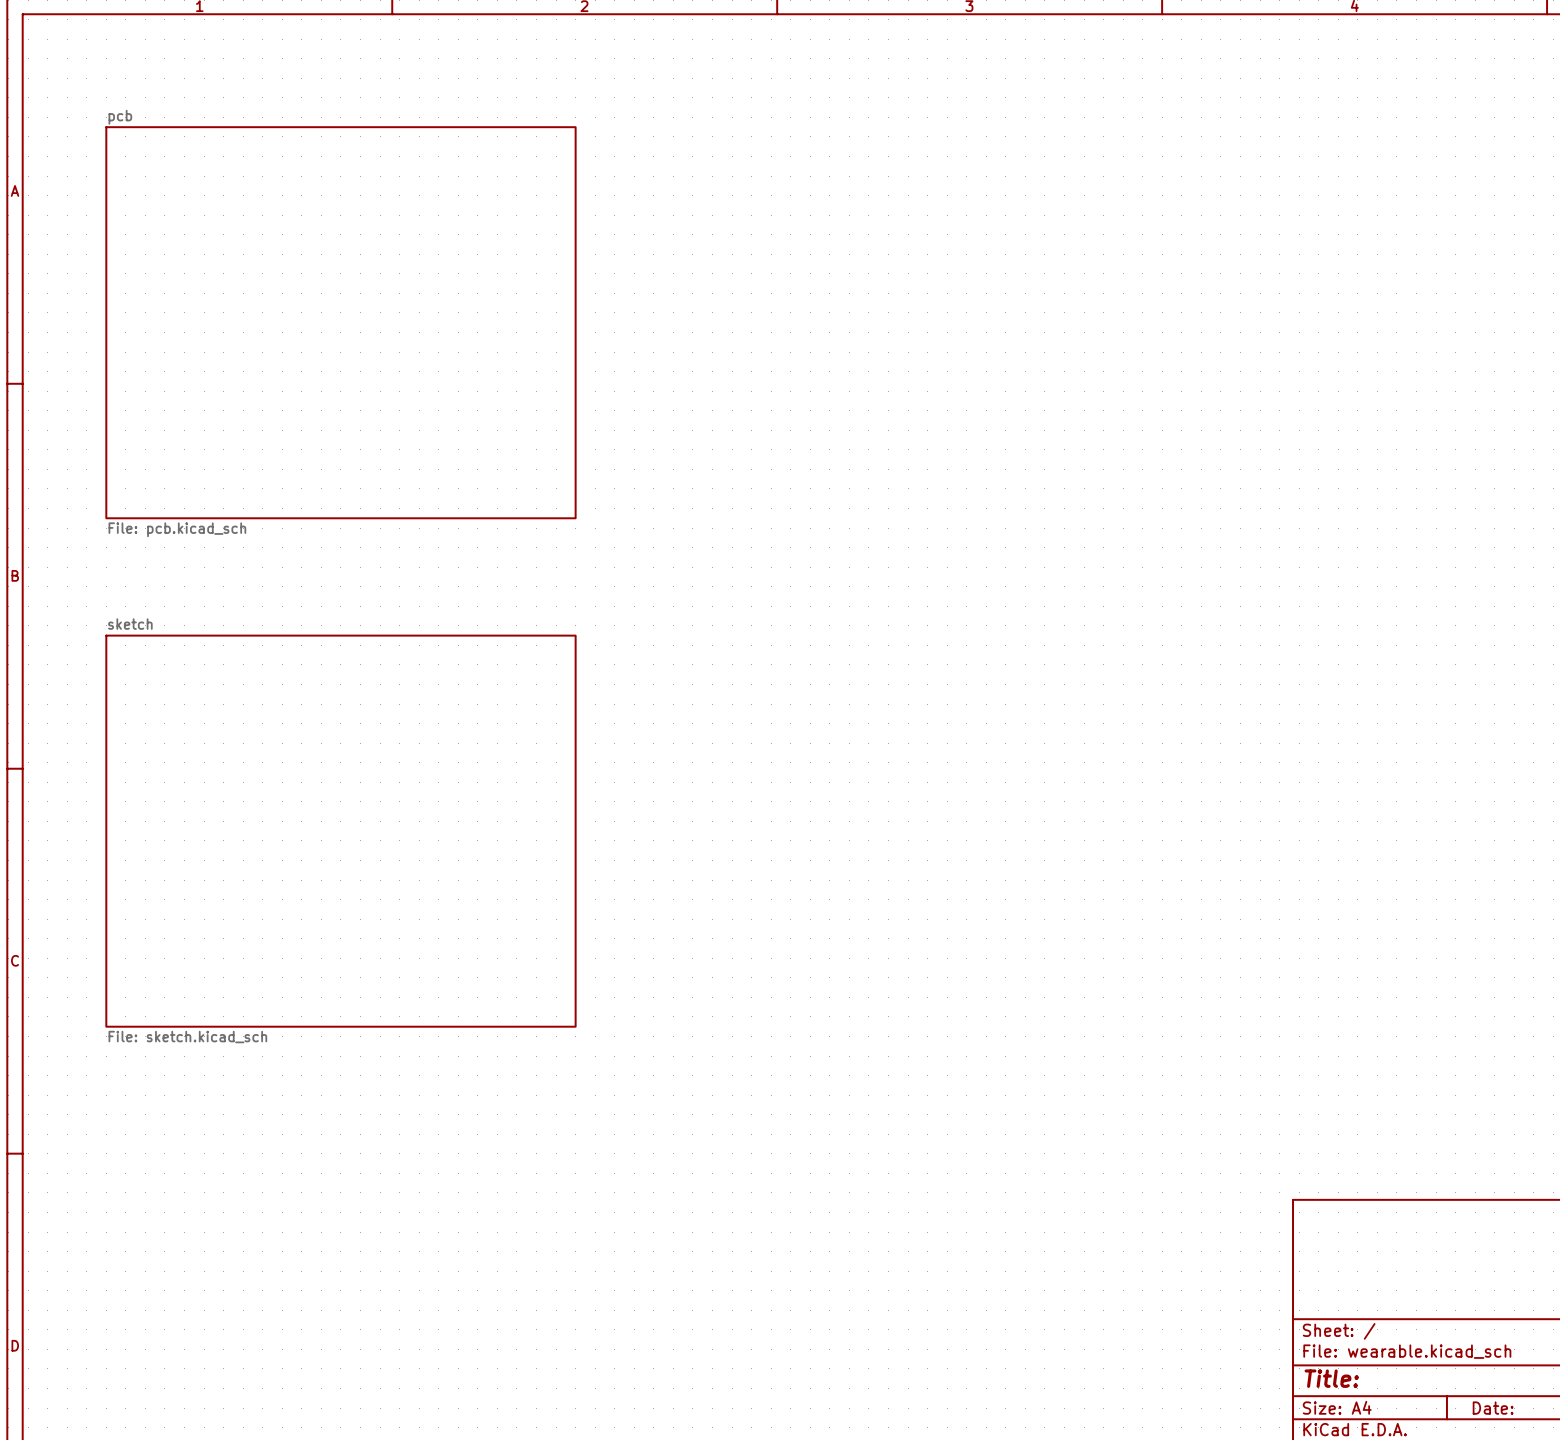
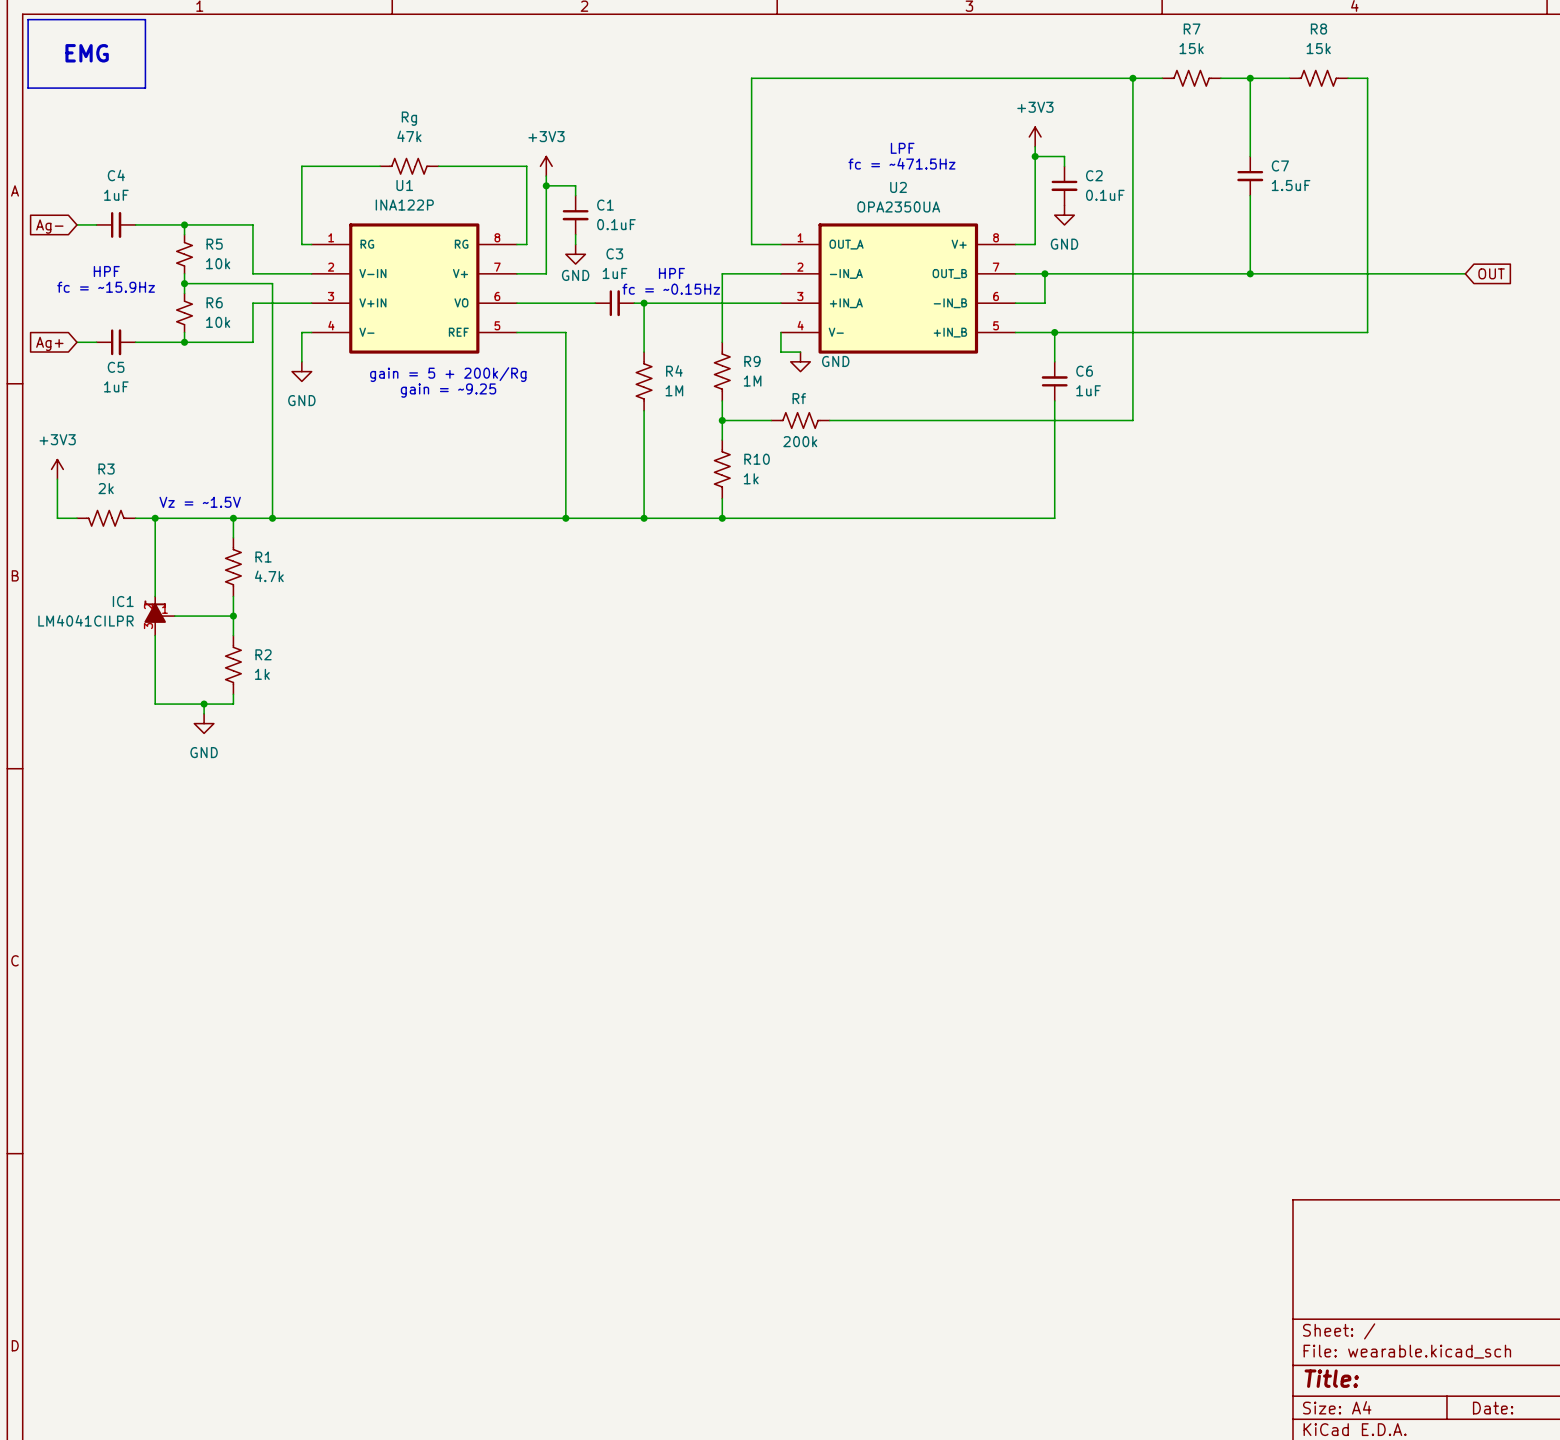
line: none -> (28, 19) (145, 19) (145, 88) (28, 88) (28, 19)
text: none -> EMG (87, 53)
wire: none -> (1132, 78) (1132, 420) (829, 420)
junction: none -> (1132, 78)
wire: none -> (1162, 78) (751, 78) (751, 244) (780, 244)
R7: none -> 15k (1191, 78)
wire: none -> (1220, 78) (1289, 78)
wire: none -> (1250, 78) (1250, 156)
junction: none -> (1250, 78)
R8: none -> 15k (1318, 78)
wire: none -> (1348, 78) (1367, 78) (1367, 332) (1015, 332)
power symbol: none -> +3V3 (1035, 136)
wire: none -> (1035, 146) (1035, 244) (1015, 244)
text: none -> LPF (902, 148)
wire: none -> (1035, 156) (1064, 156) (1064, 166)
junction: none -> (1035, 156)
text: none -> fc = ~471.5Hz (901, 163)
wire: none -> (380, 166) (301, 166) (301, 244) (311, 244)
Rg: none -> 47k (409, 166)
wire: none -> (438, 166) (526, 166) (526, 244) (516, 244)
power symbol: none -> +3V3 (546, 166)
wire: none -> (546, 176) (546, 273) (516, 273)
C7: none -> 1.5uF (1250, 176)
wire: none -> (546, 185) (575, 185) (575, 195)
junction: none -> (546, 185)
C2: none -> 0.1uF (1064, 185)
wire: none -> (1250, 195) (1250, 273)
C1: none -> 0.1uF (575, 215)
power symbol: none -> GND (1064, 215)
wire: none -> (76, 224) (96, 224)
C4: none -> 1uF (116, 224)
wire: none -> (135, 224) (252, 224) (252, 273) (311, 273)
wire: none -> (184, 224) (184, 234)
junction: none -> (184, 224)
global label: none -> Ag- (49, 226)
R5: none -> 10k (184, 254)
power symbol: none -> GND (575, 254)
text: none -> HPF (106, 271)
wire: none -> (184, 273) (184, 293)
text: none -> HPF (671, 273)
wire: none -> (780, 273) (722, 273) (722, 342)
wire: none -> (1015, 273) (1465, 273)
wire: none -> (1044, 273) (1044, 303) (1015, 303)
junction: none -> (1044, 273)
junction: none -> (1250, 273)
global label: none -> OUT (1491, 273)
wire: none -> (184, 283) (272, 283) (272, 518)
junction: none -> (184, 283)
text: none -> fc = ~15.9Hz (106, 287)
U1: none -> INA122P (414, 288)
U2: none -> OPA2350UA (898, 288)
text: none -> fc = ~0.15Hz (671, 289)
wire: none -> (311, 303) (252, 303) (252, 342) (135, 342)
wire: none -> (516, 303) (595, 303)
C3: none -> 1uF (614, 303)
wire: none -> (634, 303) (780, 303)
wire: none -> (644, 303) (644, 352)
junction: none -> (644, 303)
R6: none -> 10k (184, 312)
sheet pcb: File: pcb.kicad_sch (340, 322) -> none
wire: none -> (184, 332) (184, 342)
wire: none -> (311, 332) (301, 332) (301, 361)
wire: none -> (516, 332) (565, 332) (565, 518)
wire: none -> (780, 332) (780, 352) (800, 352)
wire: none -> (1054, 332) (1054, 361)
junction: none -> (1054, 332)
wire: none -> (76, 342) (96, 342)
C5: none -> 1uF (116, 342)
junction: none -> (184, 342)
global label: none -> Ag+ (49, 343)
power symbol: none -> GND (800, 361)
power symbol: none -> GND (301, 371)
R9: none -> 1M (722, 371)
text: none -> gain = 5 + 200k/Rg (448, 374)
R4: none -> 1M (644, 381)
C6: none -> 1uF (1054, 381)
text: none -> gain = ~9.25 (448, 390)
wire: none -> (722, 400) (722, 440)
wire: none -> (1054, 400) (1054, 518) (135, 518)
wire: none -> (644, 410) (644, 518)
wire: none -> (722, 420) (771, 420)
junction: none -> (722, 420)
Rf: none -> 200k (800, 420)
power symbol: none -> +3V3 (57, 469)
R10: none -> 1k (722, 469)
wire: none -> (57, 479) (57, 518) (76, 518)
wire: none -> (722, 498) (722, 518)
text: none -> Vz = ~1.5V (200, 502)
R3: none -> 2k (106, 518)
wire: none -> (155, 518) (155, 596)
junction: none -> (155, 518)
wire: none -> (233, 518) (233, 537)
junction: none -> (233, 518)
junction: none -> (272, 518)
junction: none -> (565, 518)
junction: none -> (644, 518)
junction: none -> (722, 518)
R1: none -> 4.7k (233, 567)
wire: none -> (233, 596) (233, 635)
IC1: none -> LM4041CILPR (159, 616)
wire: none -> (174, 616) (233, 616)
junction: none -> (233, 616)
wire: none -> (155, 635) (155, 704) (233, 704) (233, 694)
R2: none -> 1k (233, 664)
wire: none -> (204, 704) (204, 713)
junction: none -> (204, 704)
power symbol: none -> GND (204, 723)
sheet sketch: File: sketch.kicad_sch (340, 831) -> none

